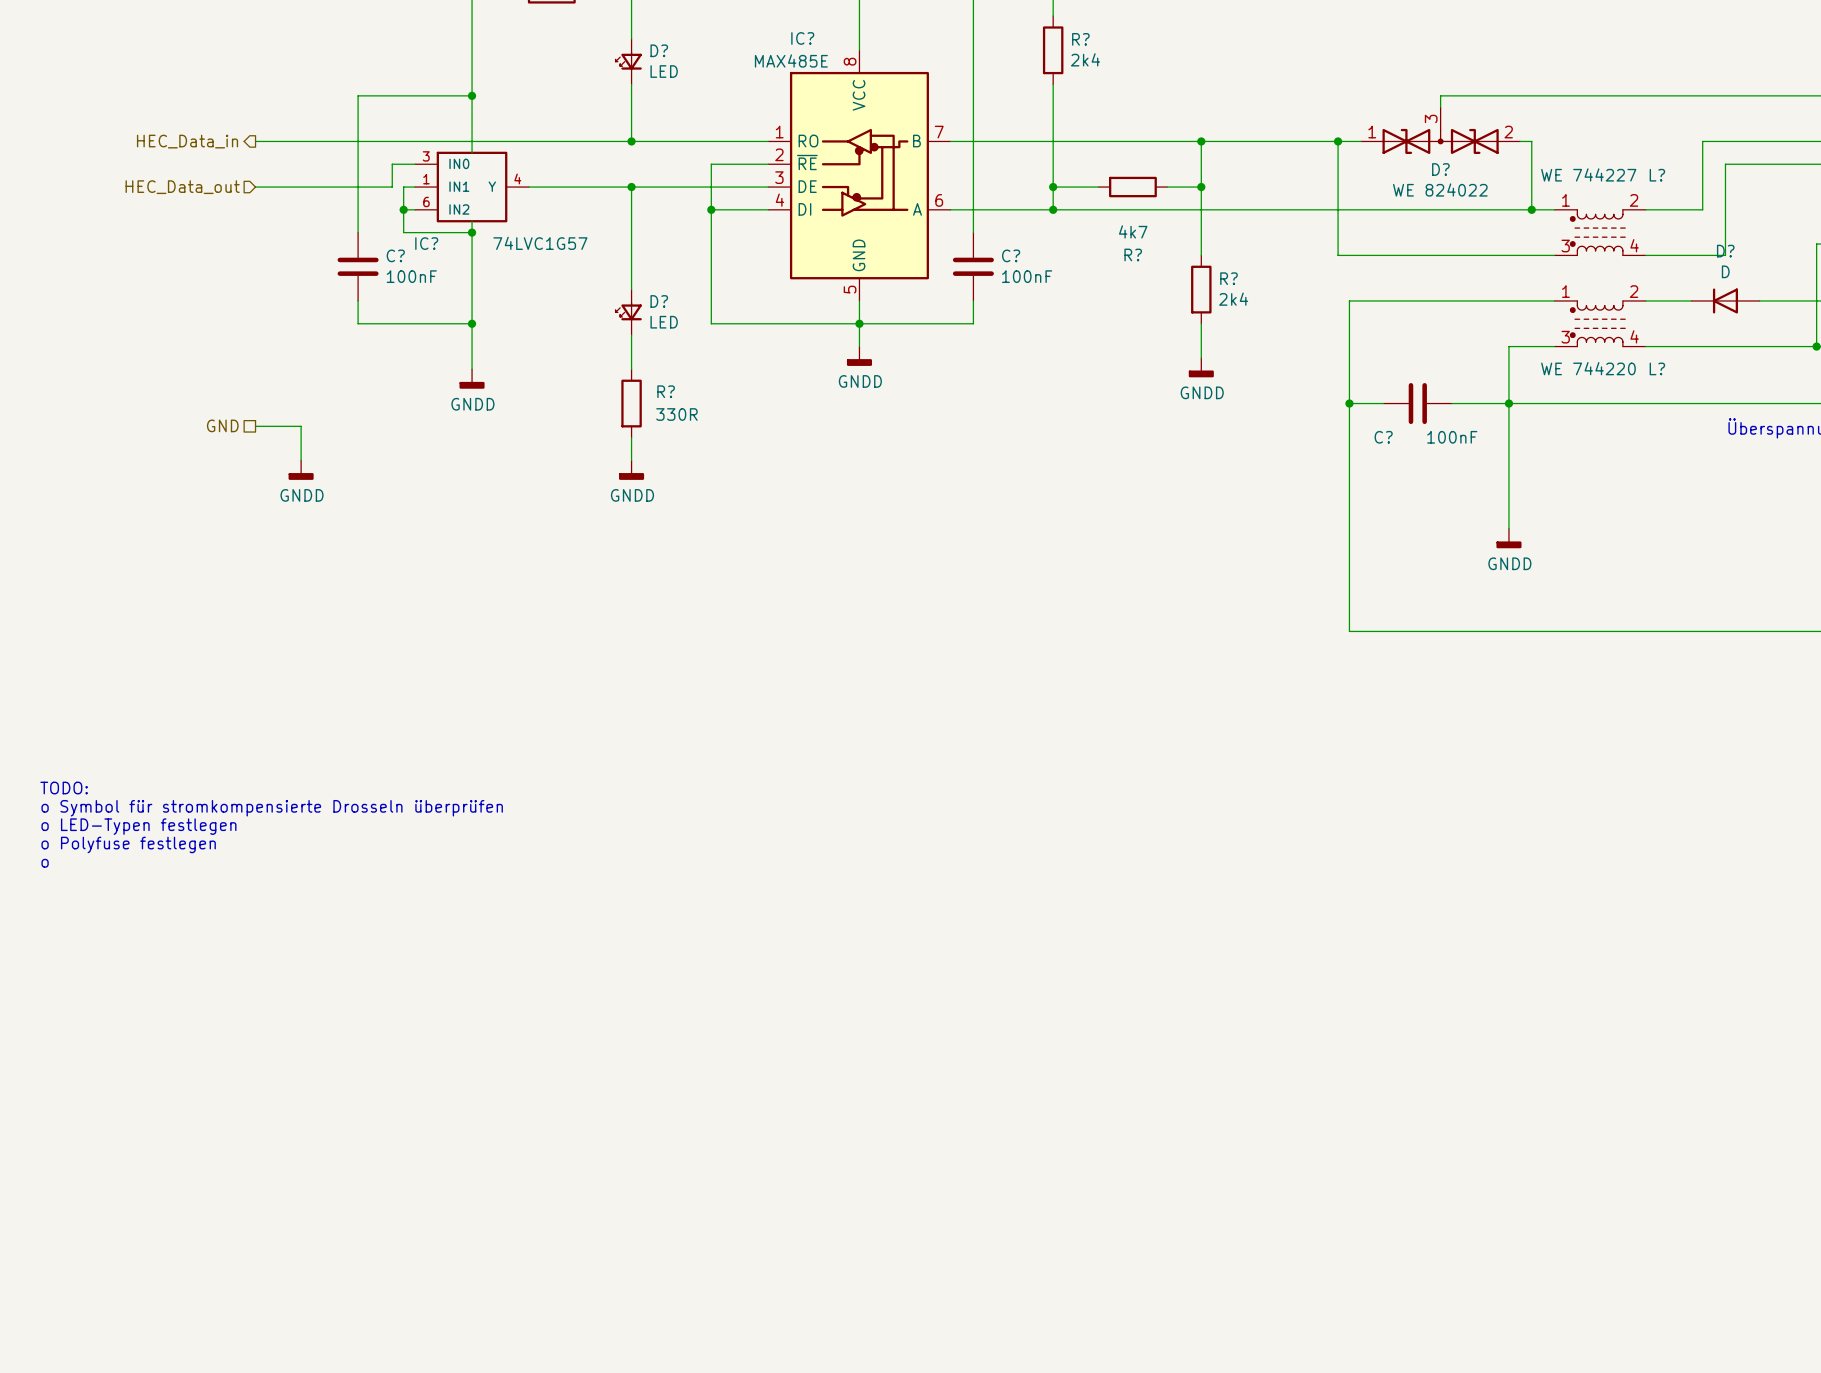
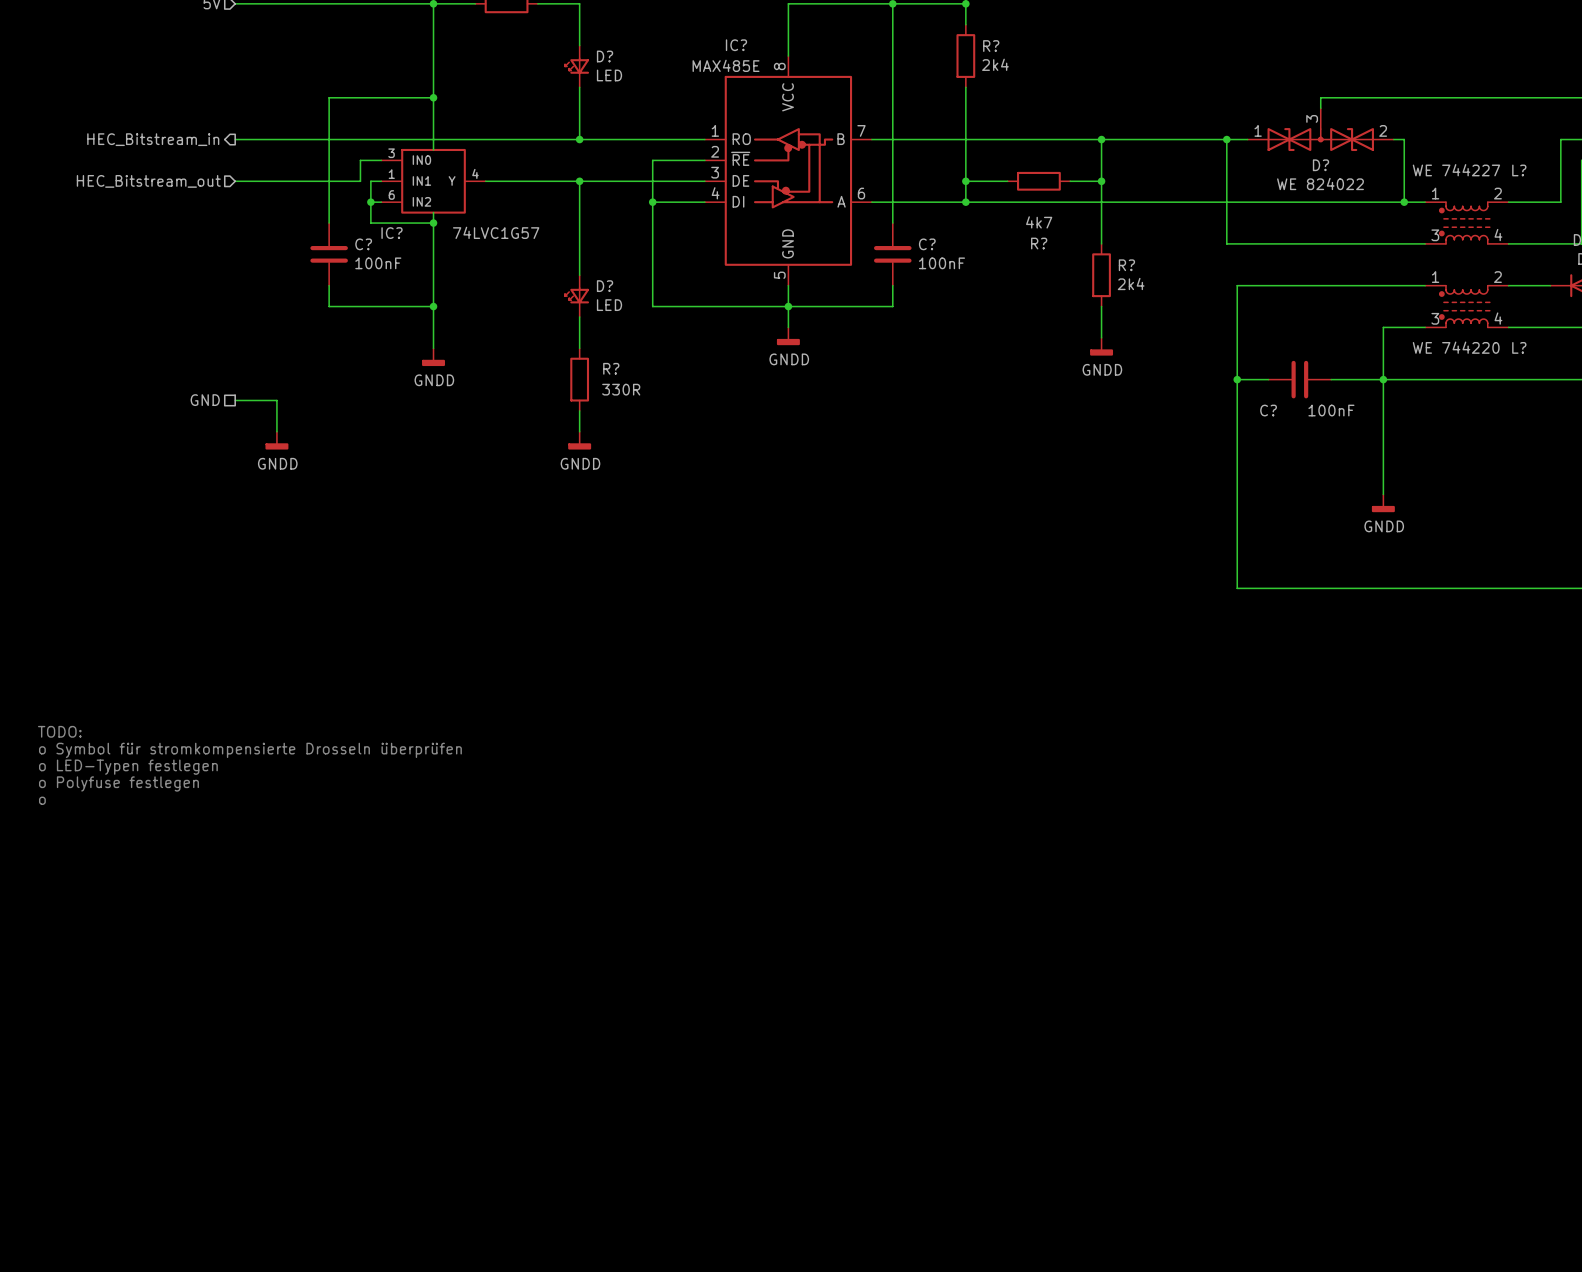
hierarchical label: HEC_Data_in (187, 141) -> HEC_Bitstream_in (153, 139)
hierarchical label: HEC_Data_out (182, 187) -> HEC_Bitstream_out (148, 181)

